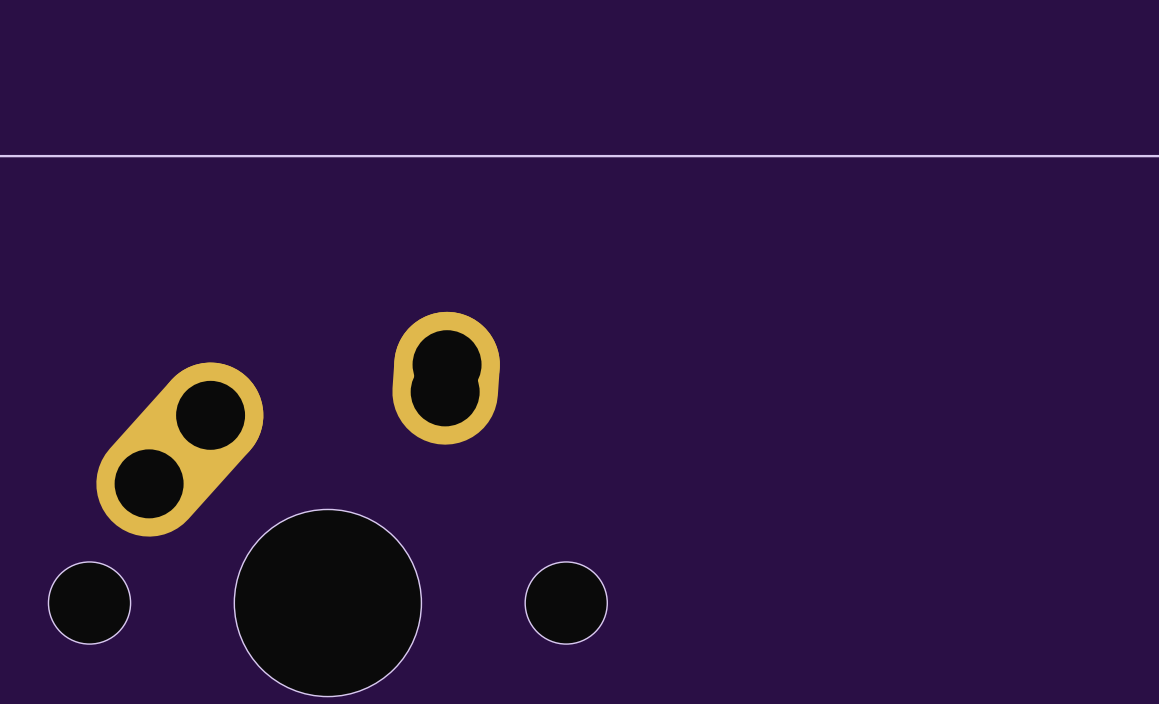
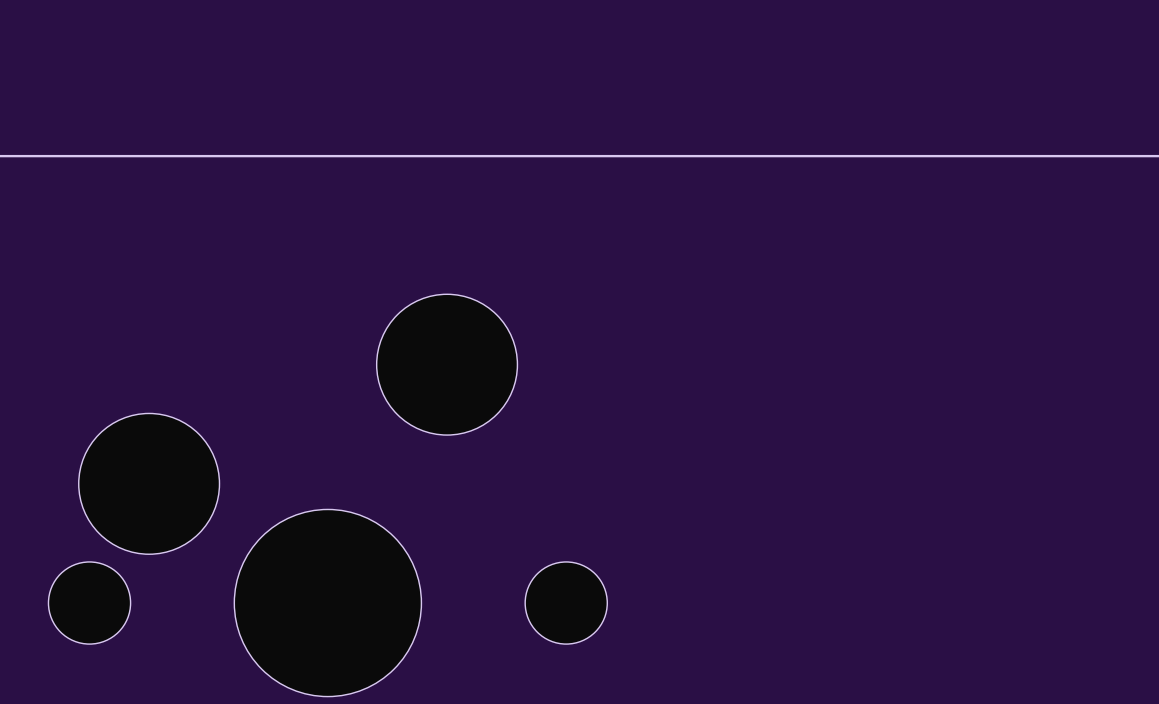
part footprint: [48, 311, 608, 697] -> [48, 294, 608, 697]

